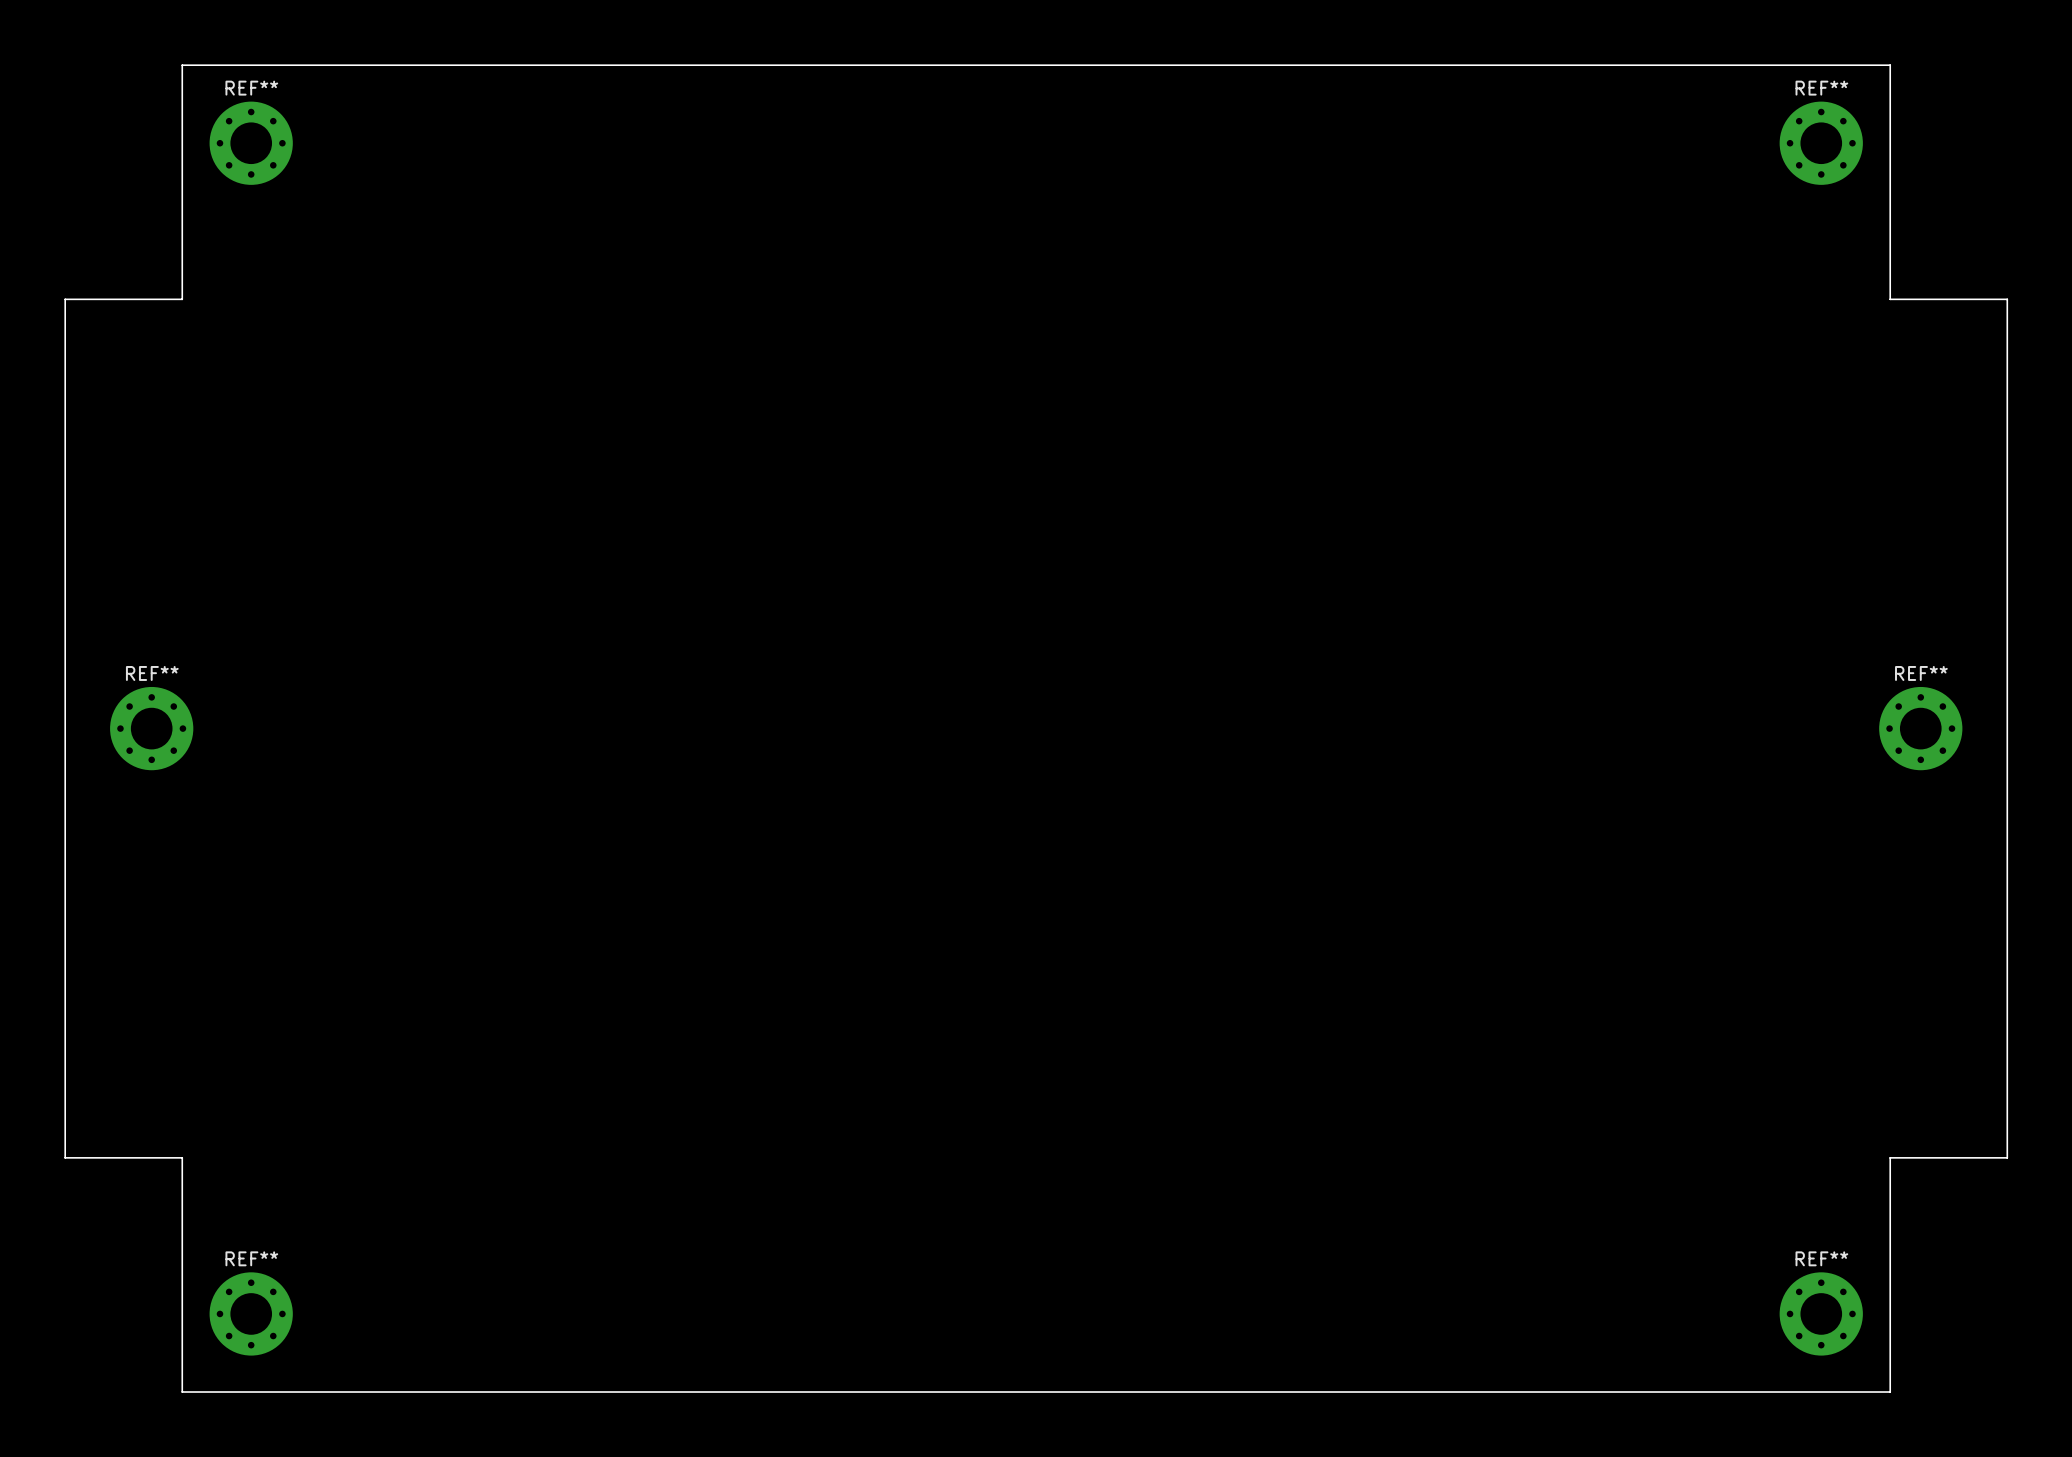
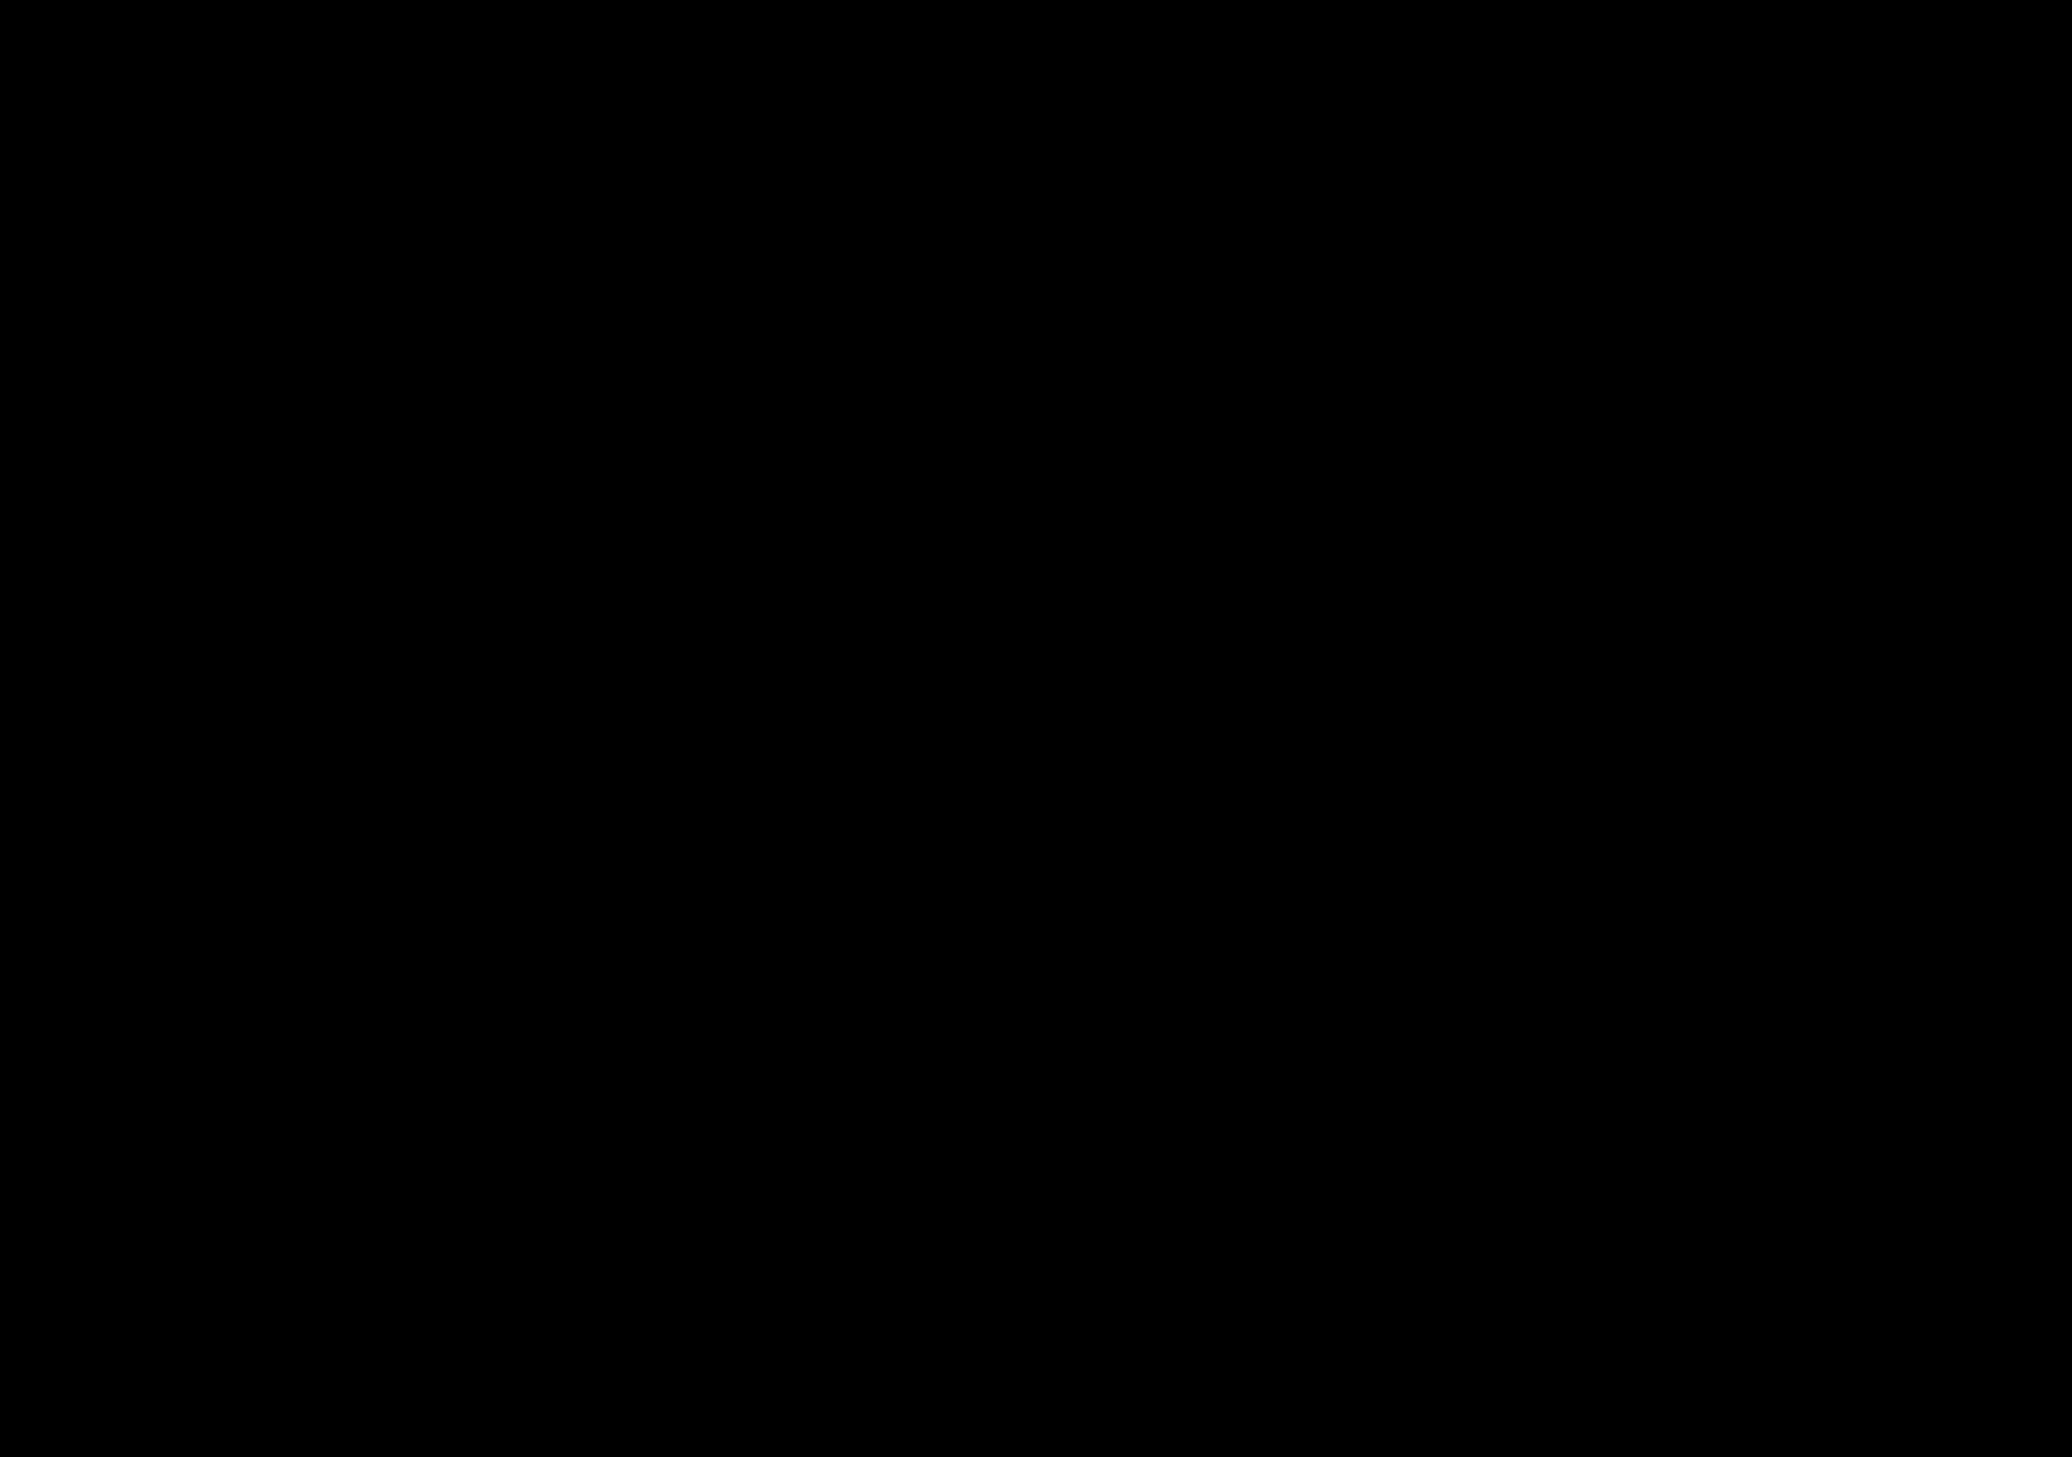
board edge: (182, 65) (182, 299) (65, 299) (65, 1157) (182, 1157) (182, 1392) (1890, 1392) (1890, 1157) (2007, 1157) (2007, 299) (1890, 299) (1890, 65) (182, 65) -> none
REF**: (251, 143) -> none
REF**: (1821, 143) -> none
REF**: (151, 728) -> none
REF**: (1920, 728) -> none
REF**: (251, 1313) -> none
REF**: (1821, 1313) -> none

